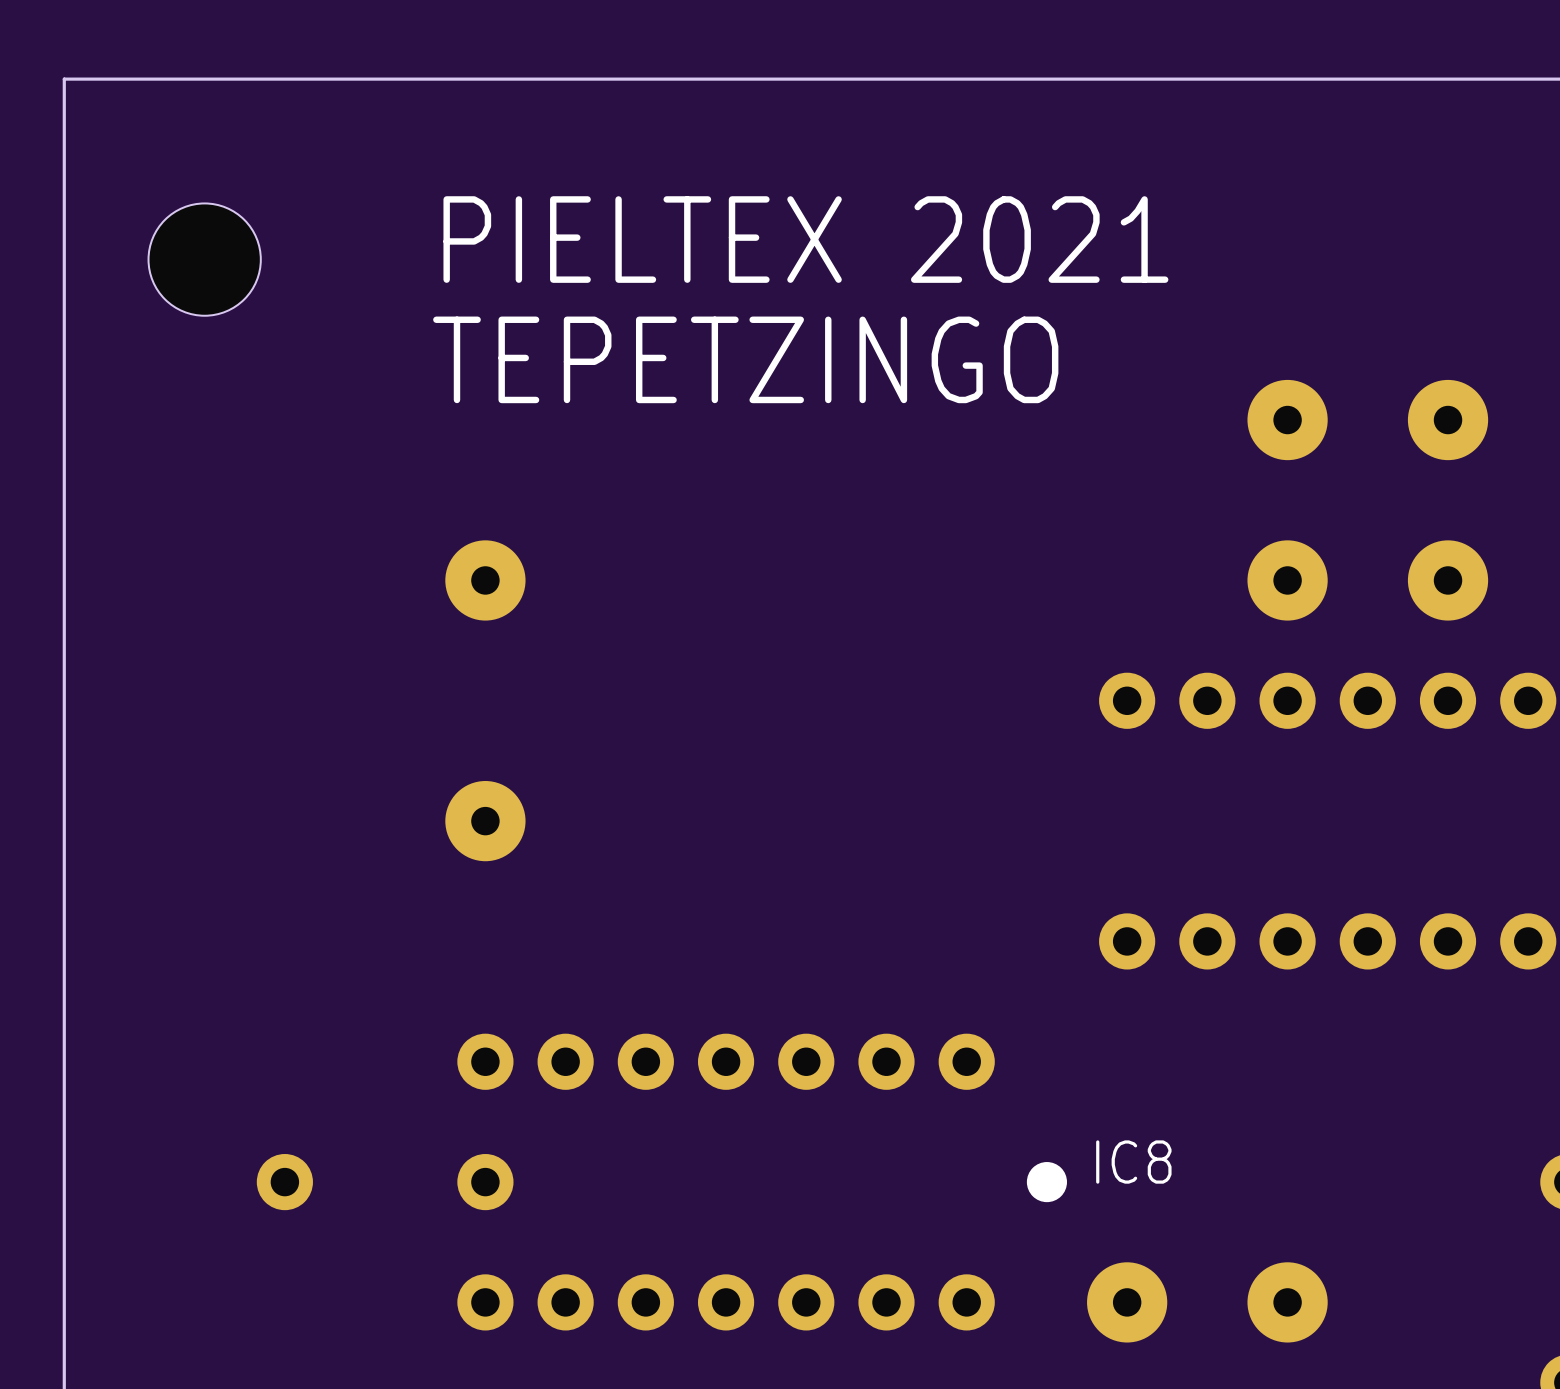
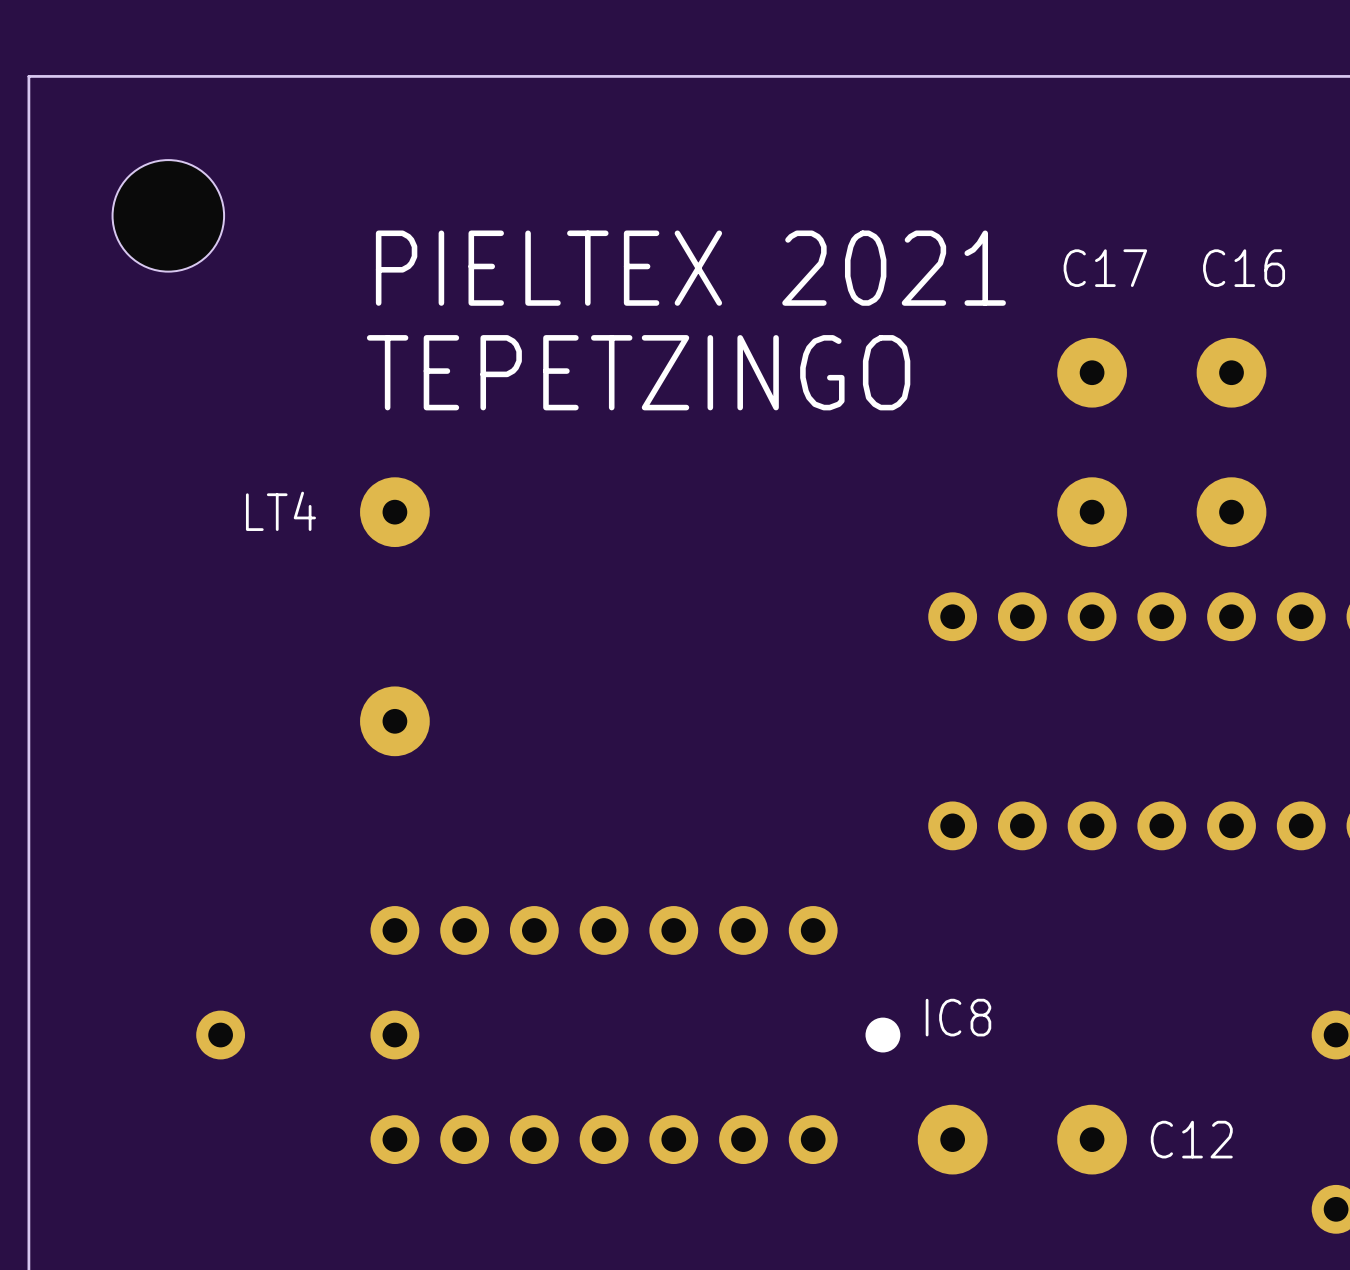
hole size: [148, 203, 261, 316] -> [112, 160, 225, 272]
text position: PIELTEX 2021 (805, 239) -> PIELTEX 2021 (690, 268)
text: none -> C17 (1105, 268)
text: none -> C16 (1244, 268)
text position: TEPETZINGO (745, 359) -> TEPETZINGO (638, 372)
text: none -> LT4 (280, 511)
text: none -> C12 (1191, 1139)

